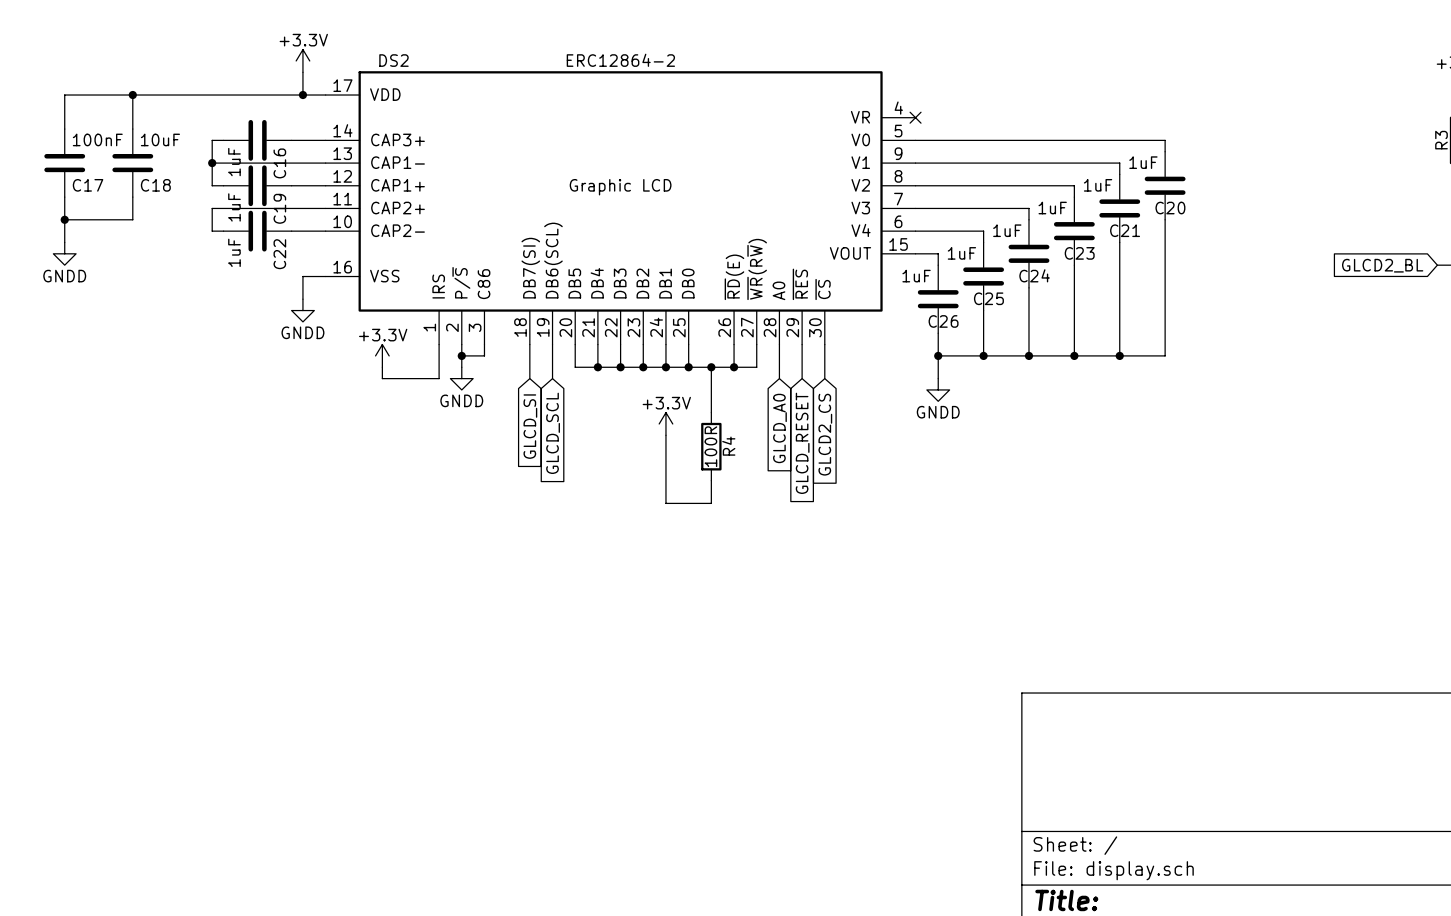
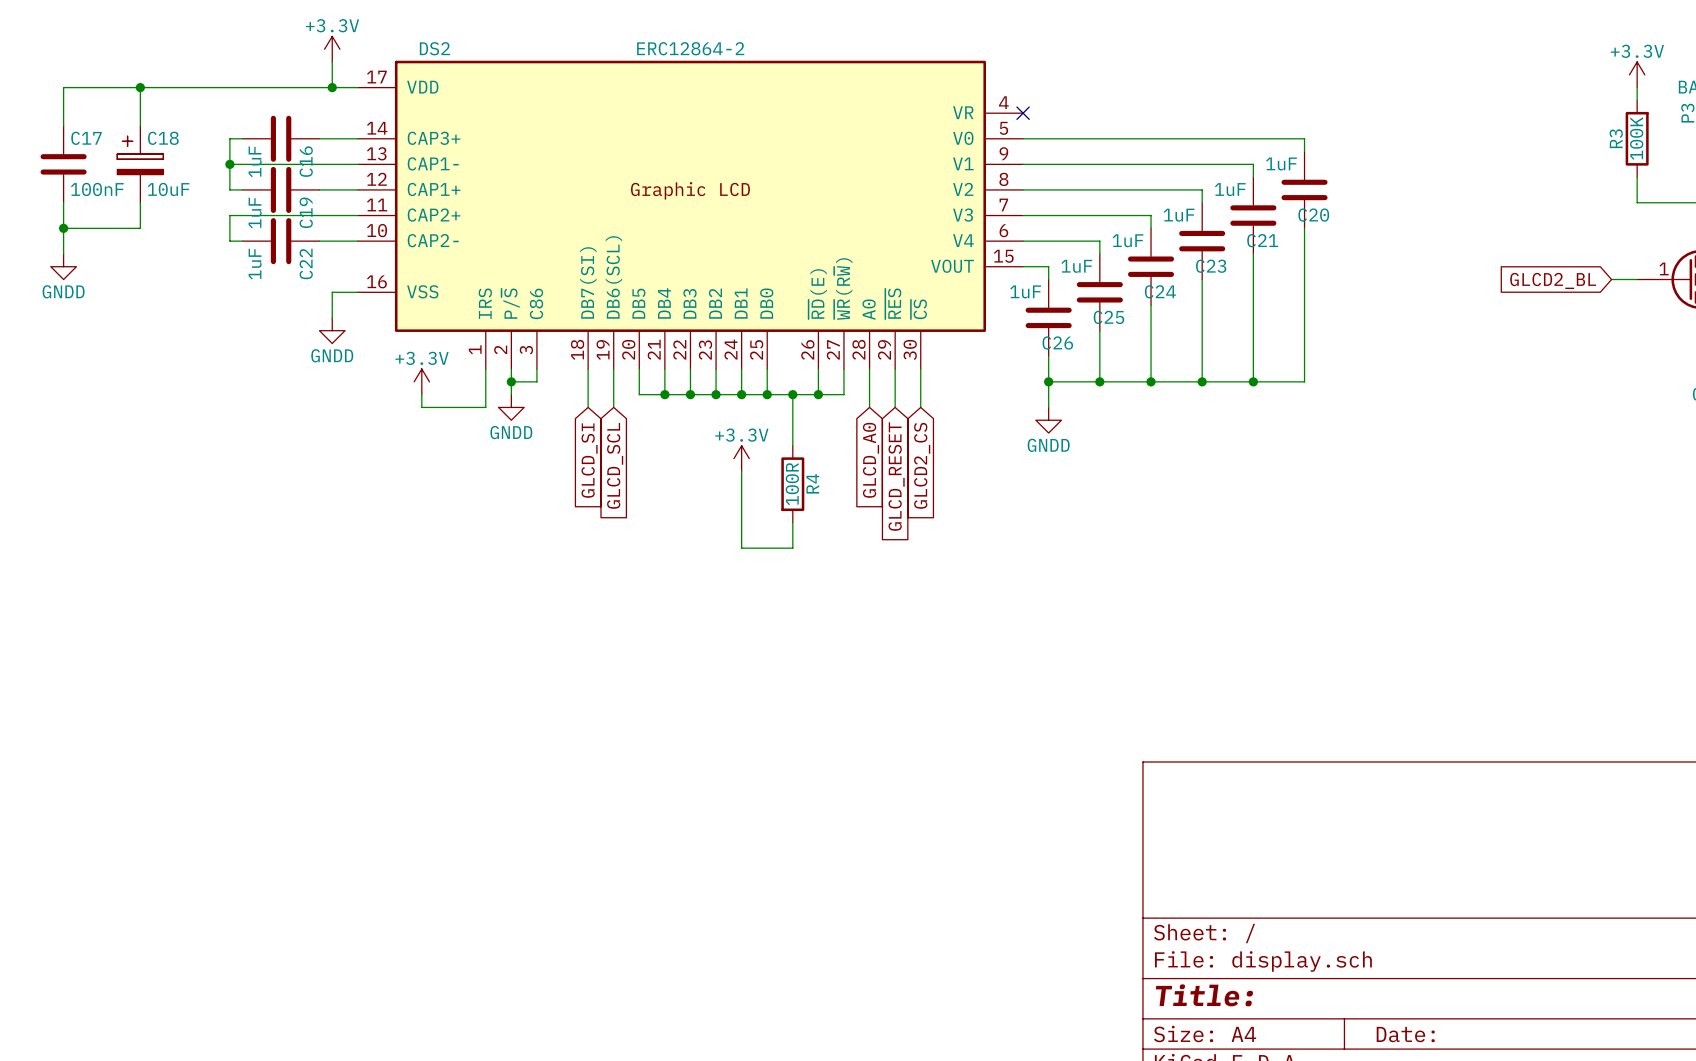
C18 symbol: [112, 129, 154, 198] -> [117, 125, 164, 203]
C17 value position: 100nF (97, 139) -> 100nF (97, 189)
C18 value position: 10uF (160, 139) -> 10uF (168, 189)
C17 name position: C17 (88, 185) -> C17 (86, 138)
C18 name position: C18 (155, 185) -> C18 (163, 138)

